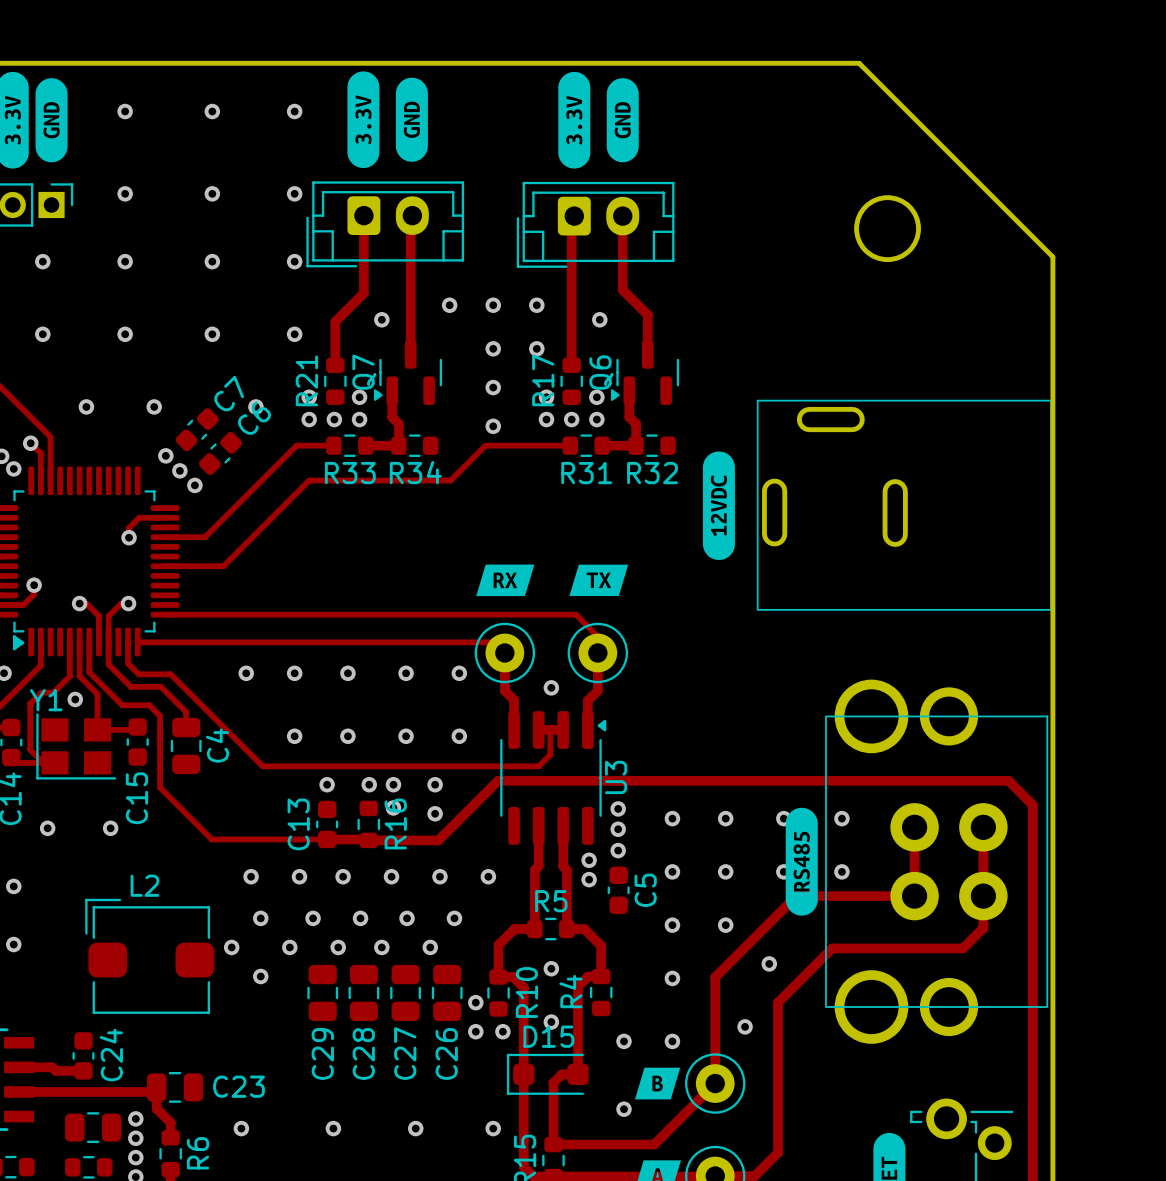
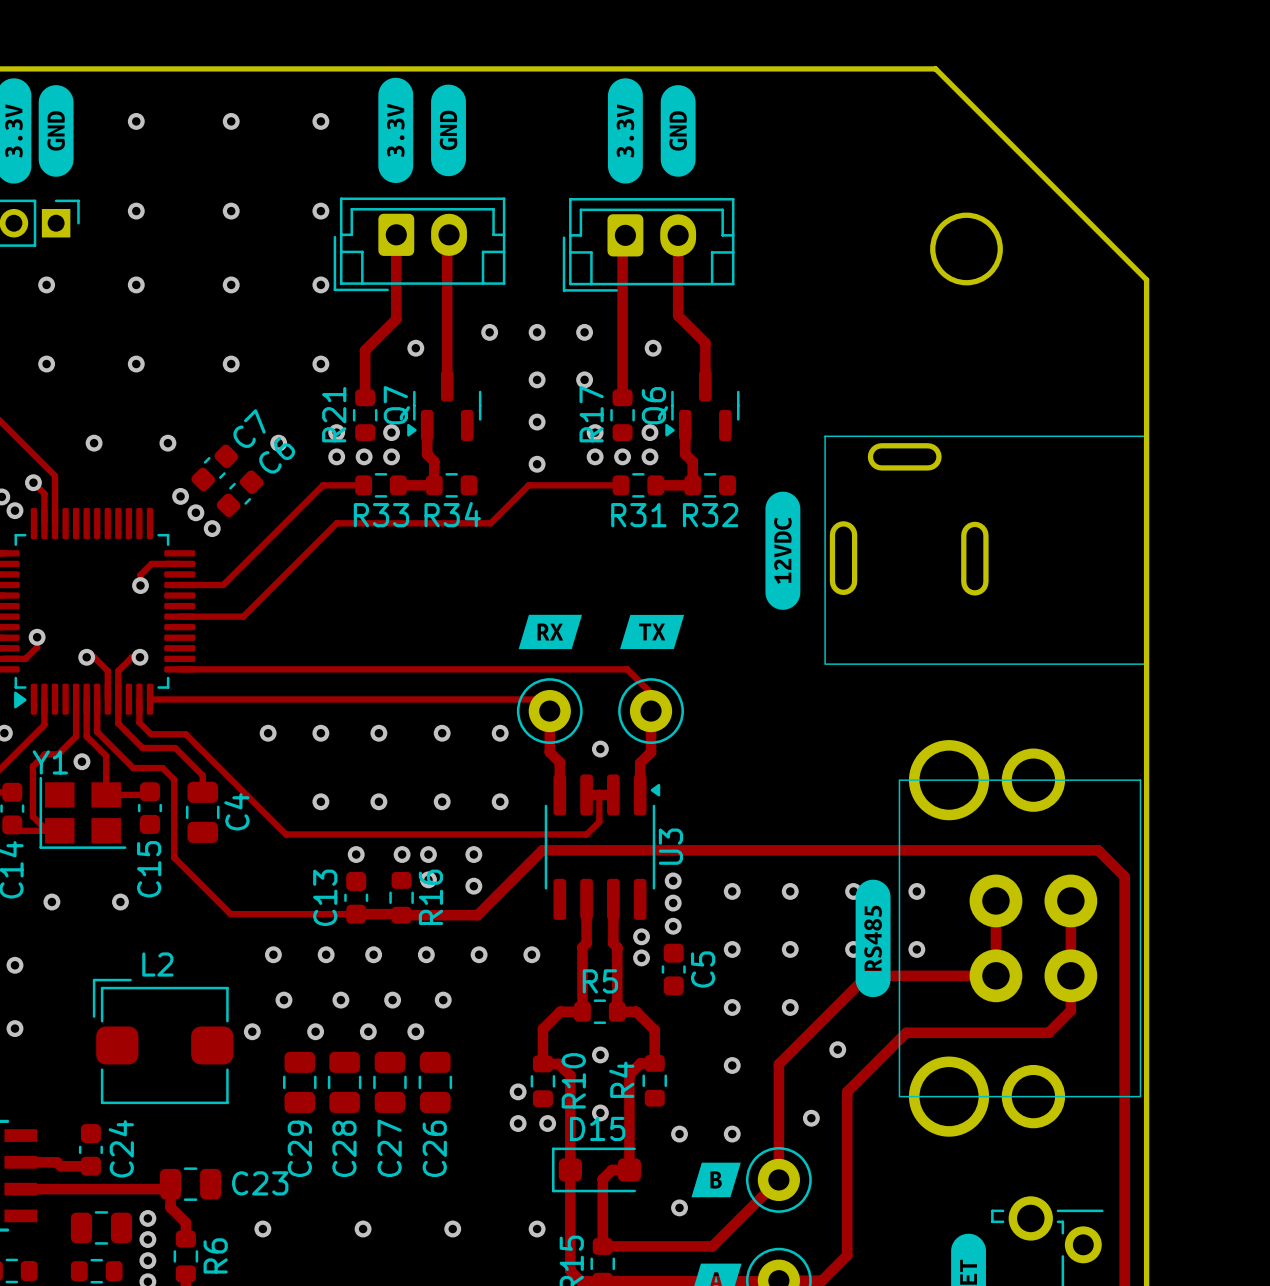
via: (454, 918) -> none
via: (430, 947) -> none
via: (260, 976) -> none
C29 position: (322, 992) -> (299, 1082)
C28 position: (363, 992) -> (344, 1082)
C27 position: (405, 992) -> (389, 1082)
C26 position: (447, 992) -> (435, 1082)

